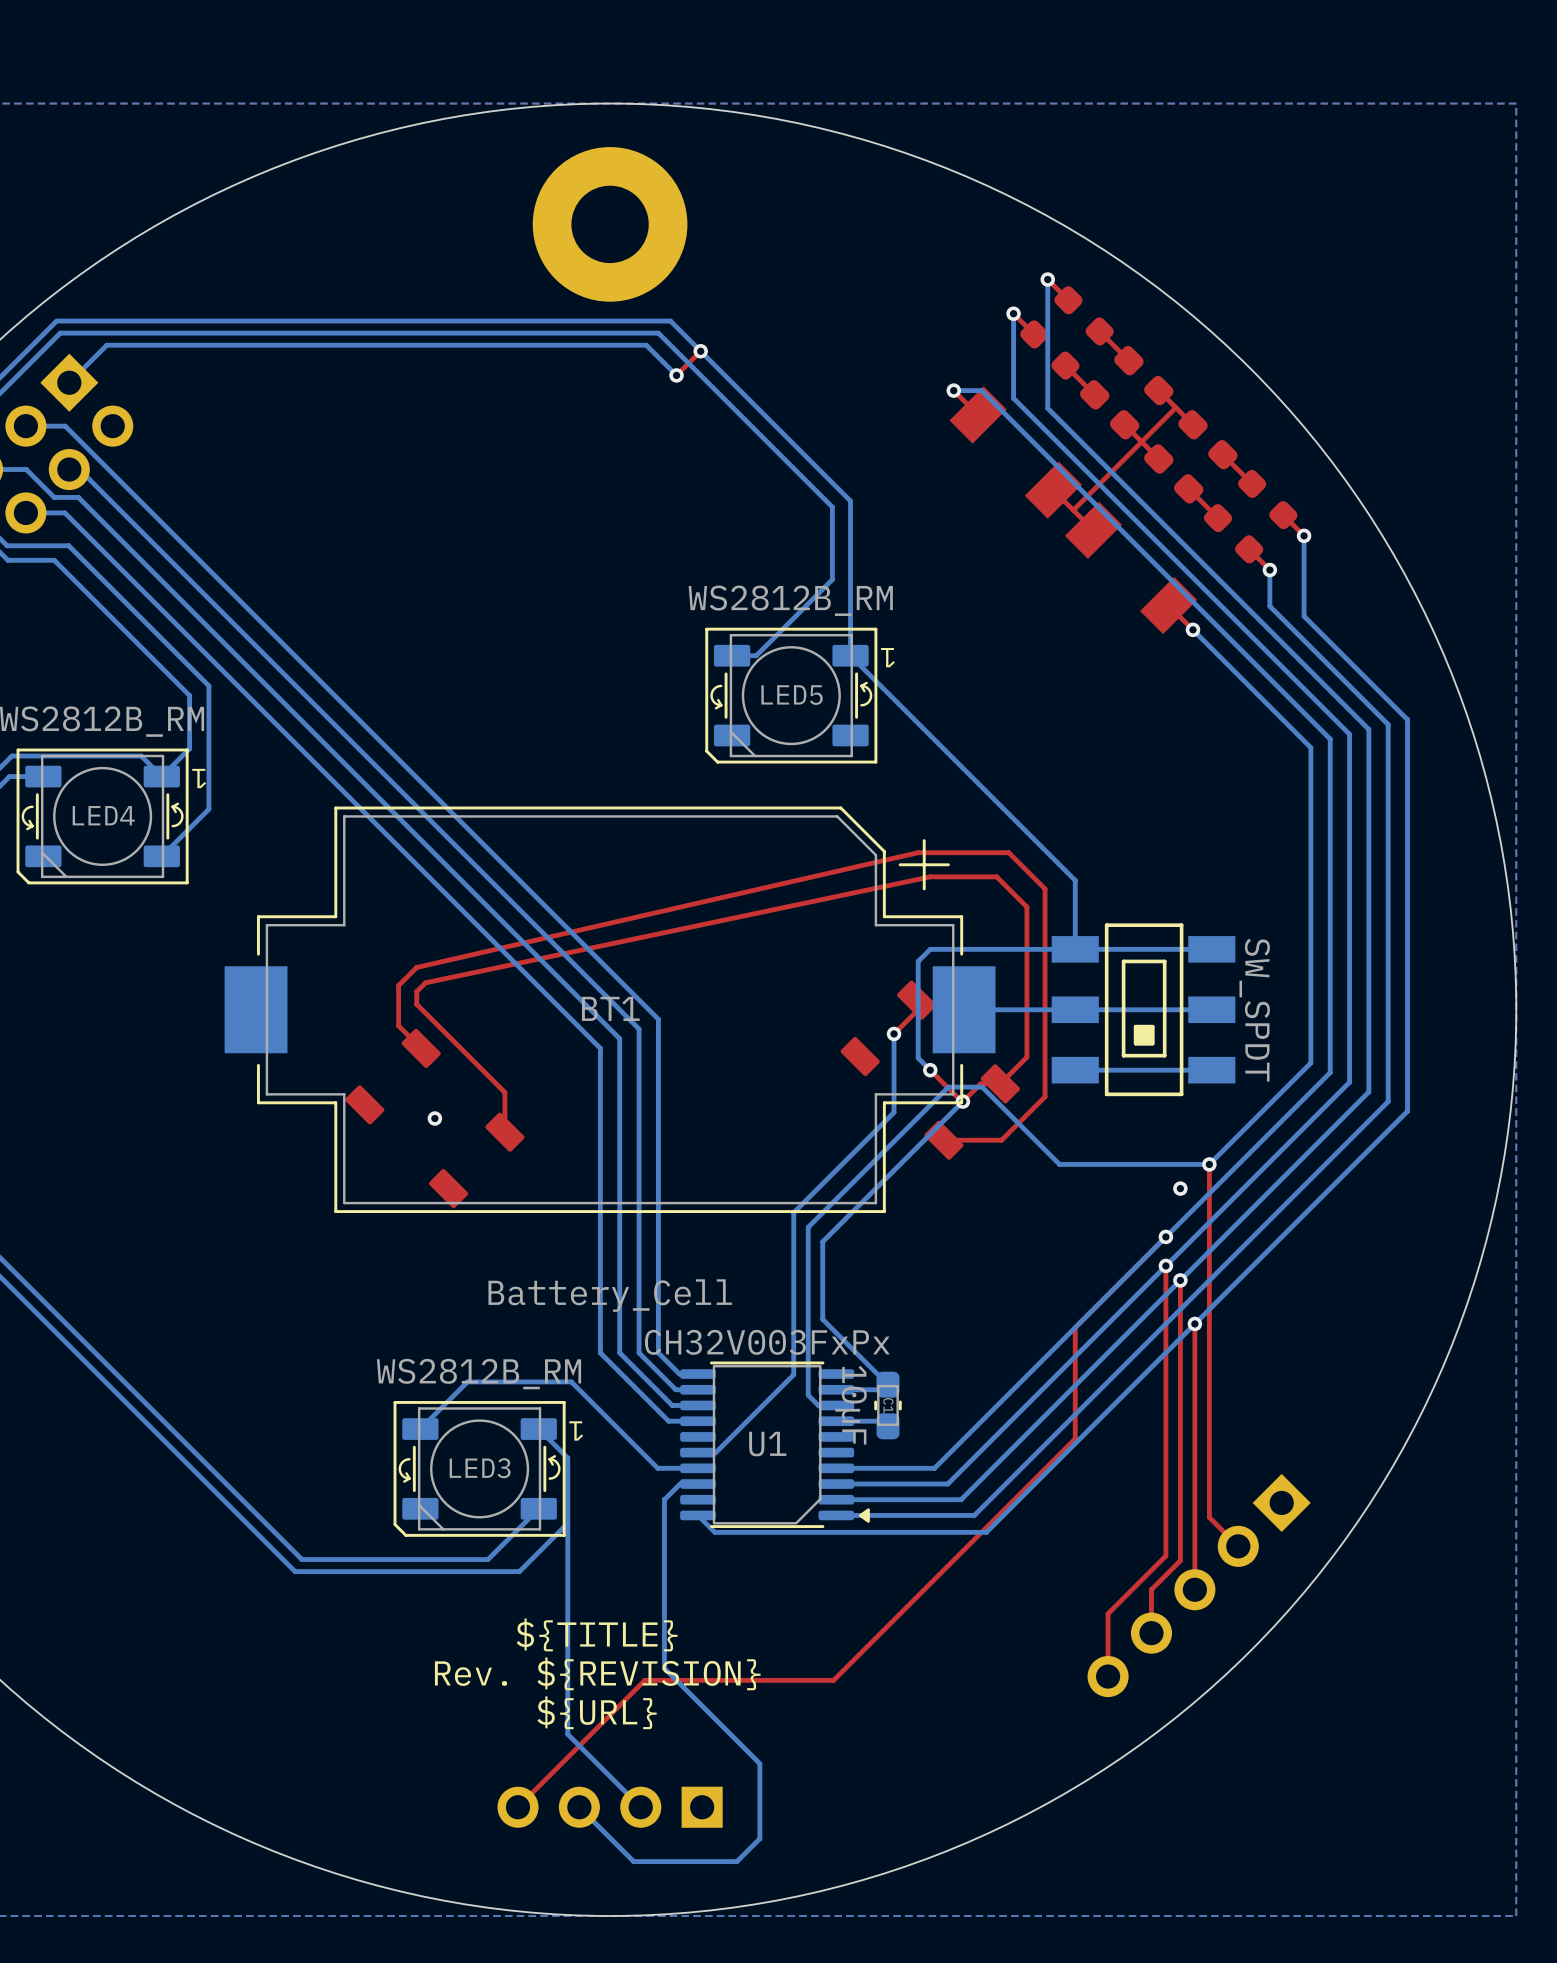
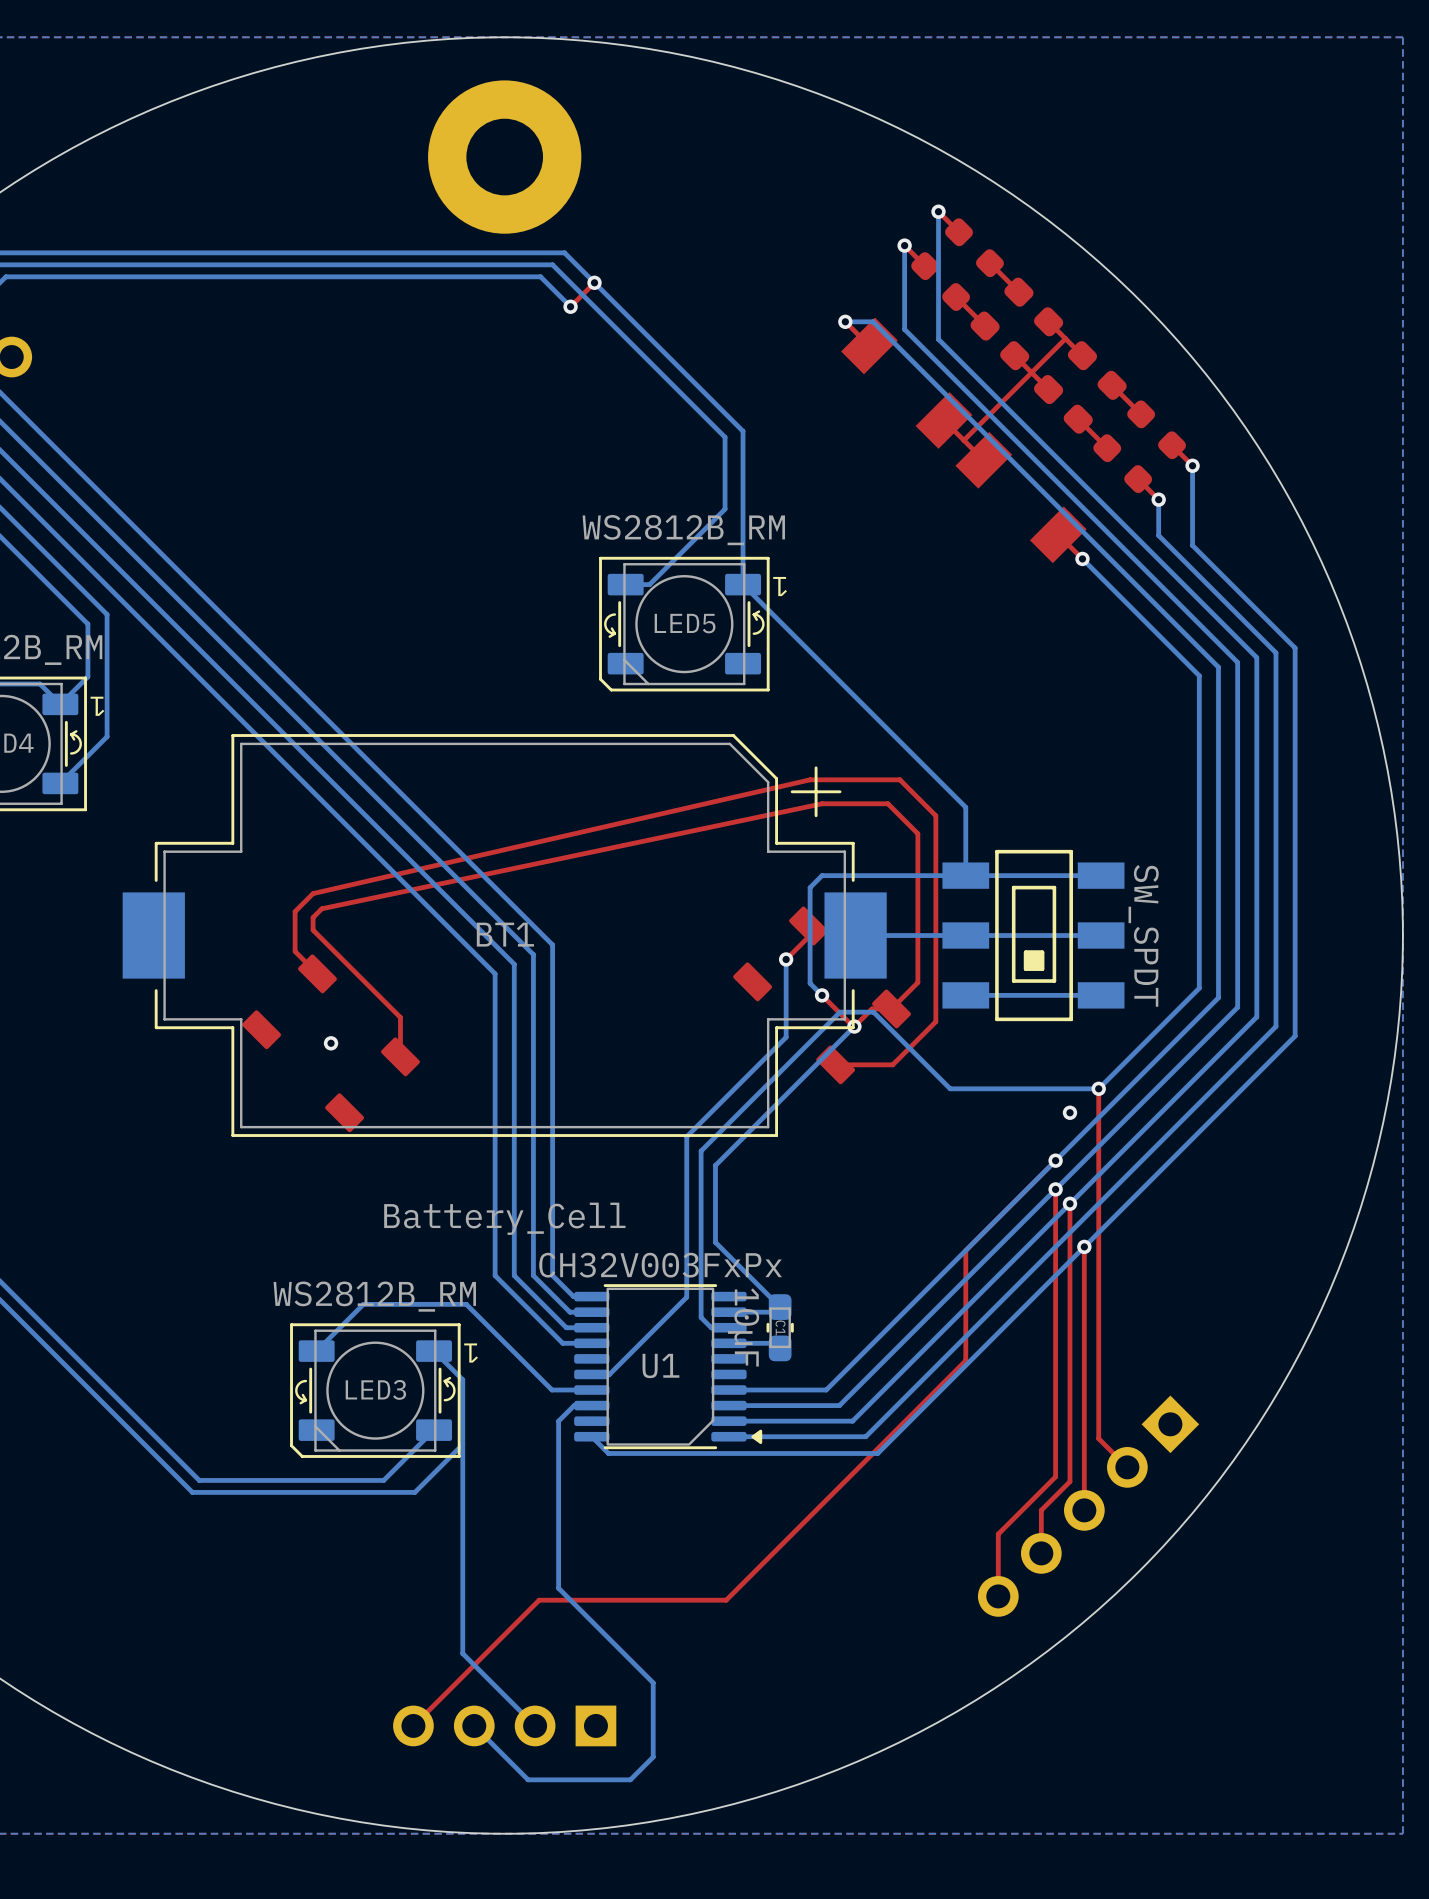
text: ${TITLE} (597, 1634) -> none
text: Rev. ${REVISION} (597, 1673) -> none
text: ${URL} (597, 1712) -> none

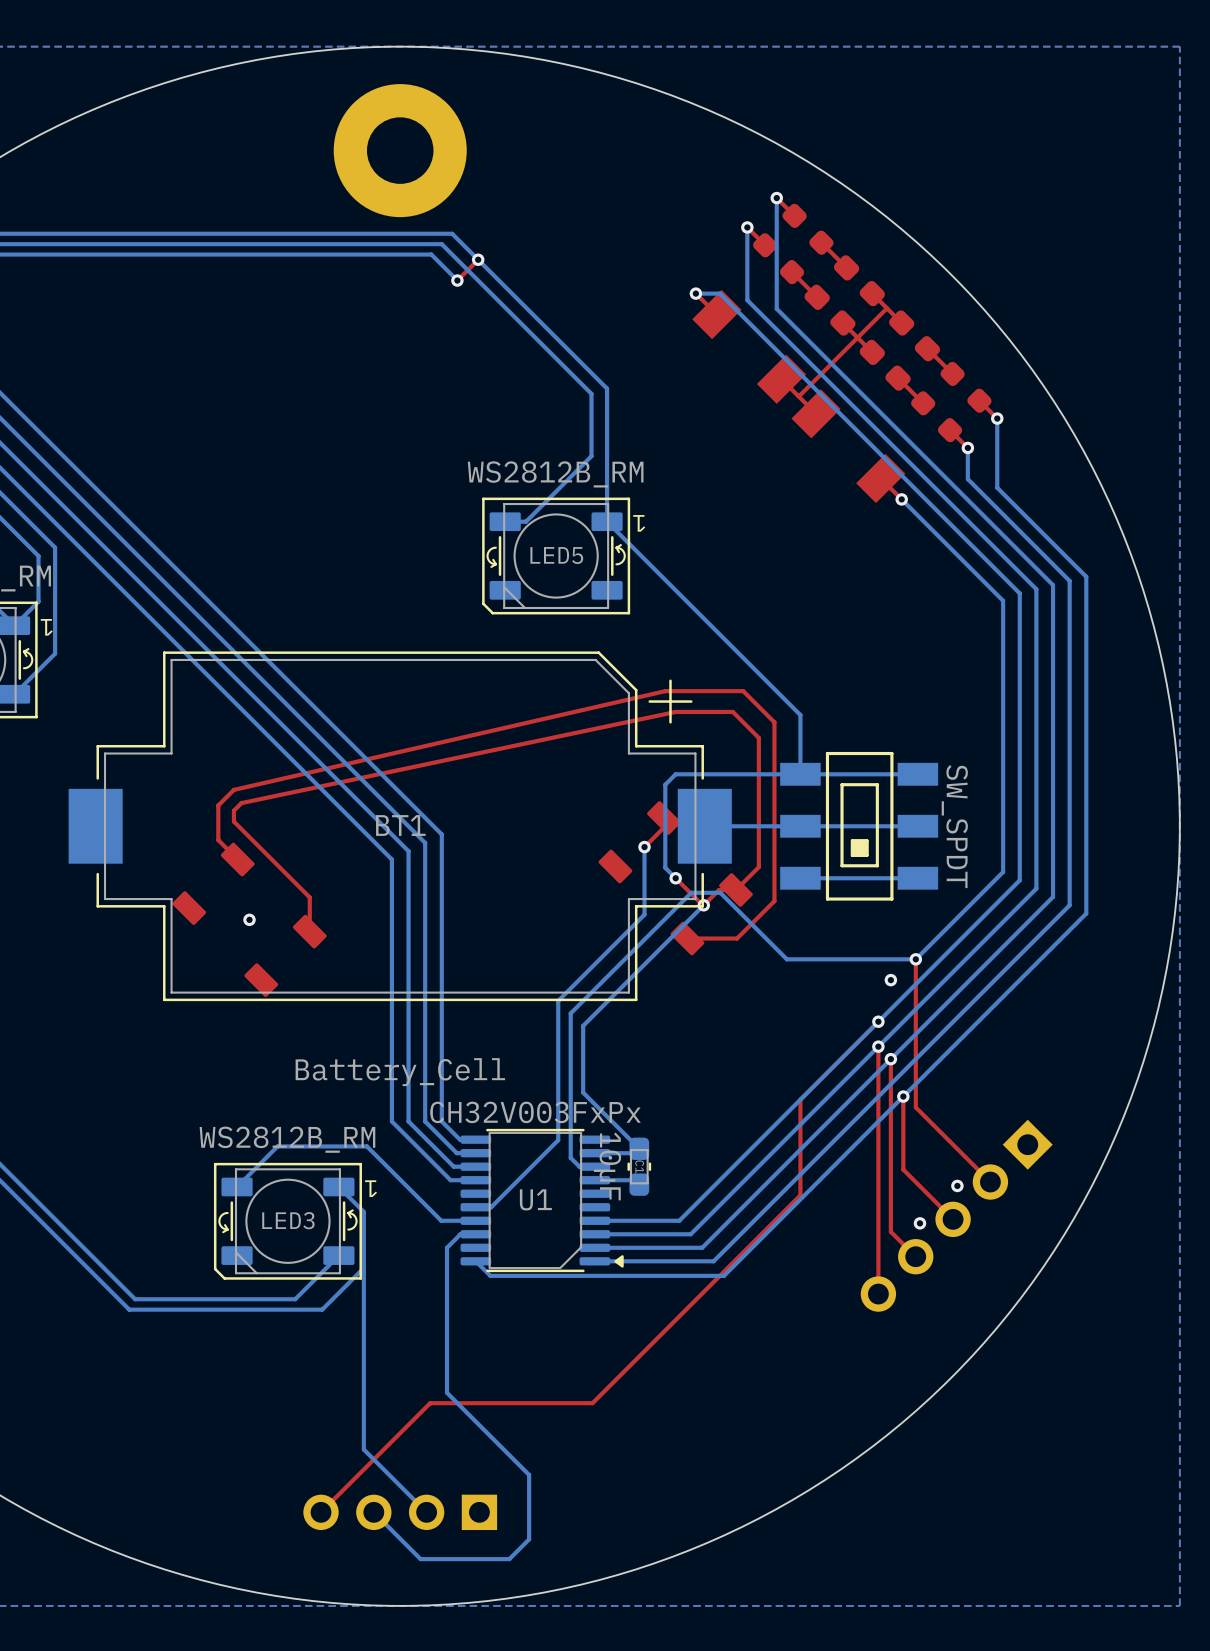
top track: (1098, 1259) (1098, 1438) (1127, 1467) -> (915, 1107) (990, 1182)
top track: (1084, 1331) (1084, 1510) -> (903, 1169) (953, 1219)
via: none -> (957, 1185)
via: none -> (919, 1223)
top track: (1069, 1402) (1069, 1481) (1041, 1510) (1041, 1553) -> (890, 1231) (915, 1256)
top track: (1055, 1474) (1055, 1476) (998, 1534) (998, 1596) -> none
part position: (1088, 1506) -> (956, 1215)

